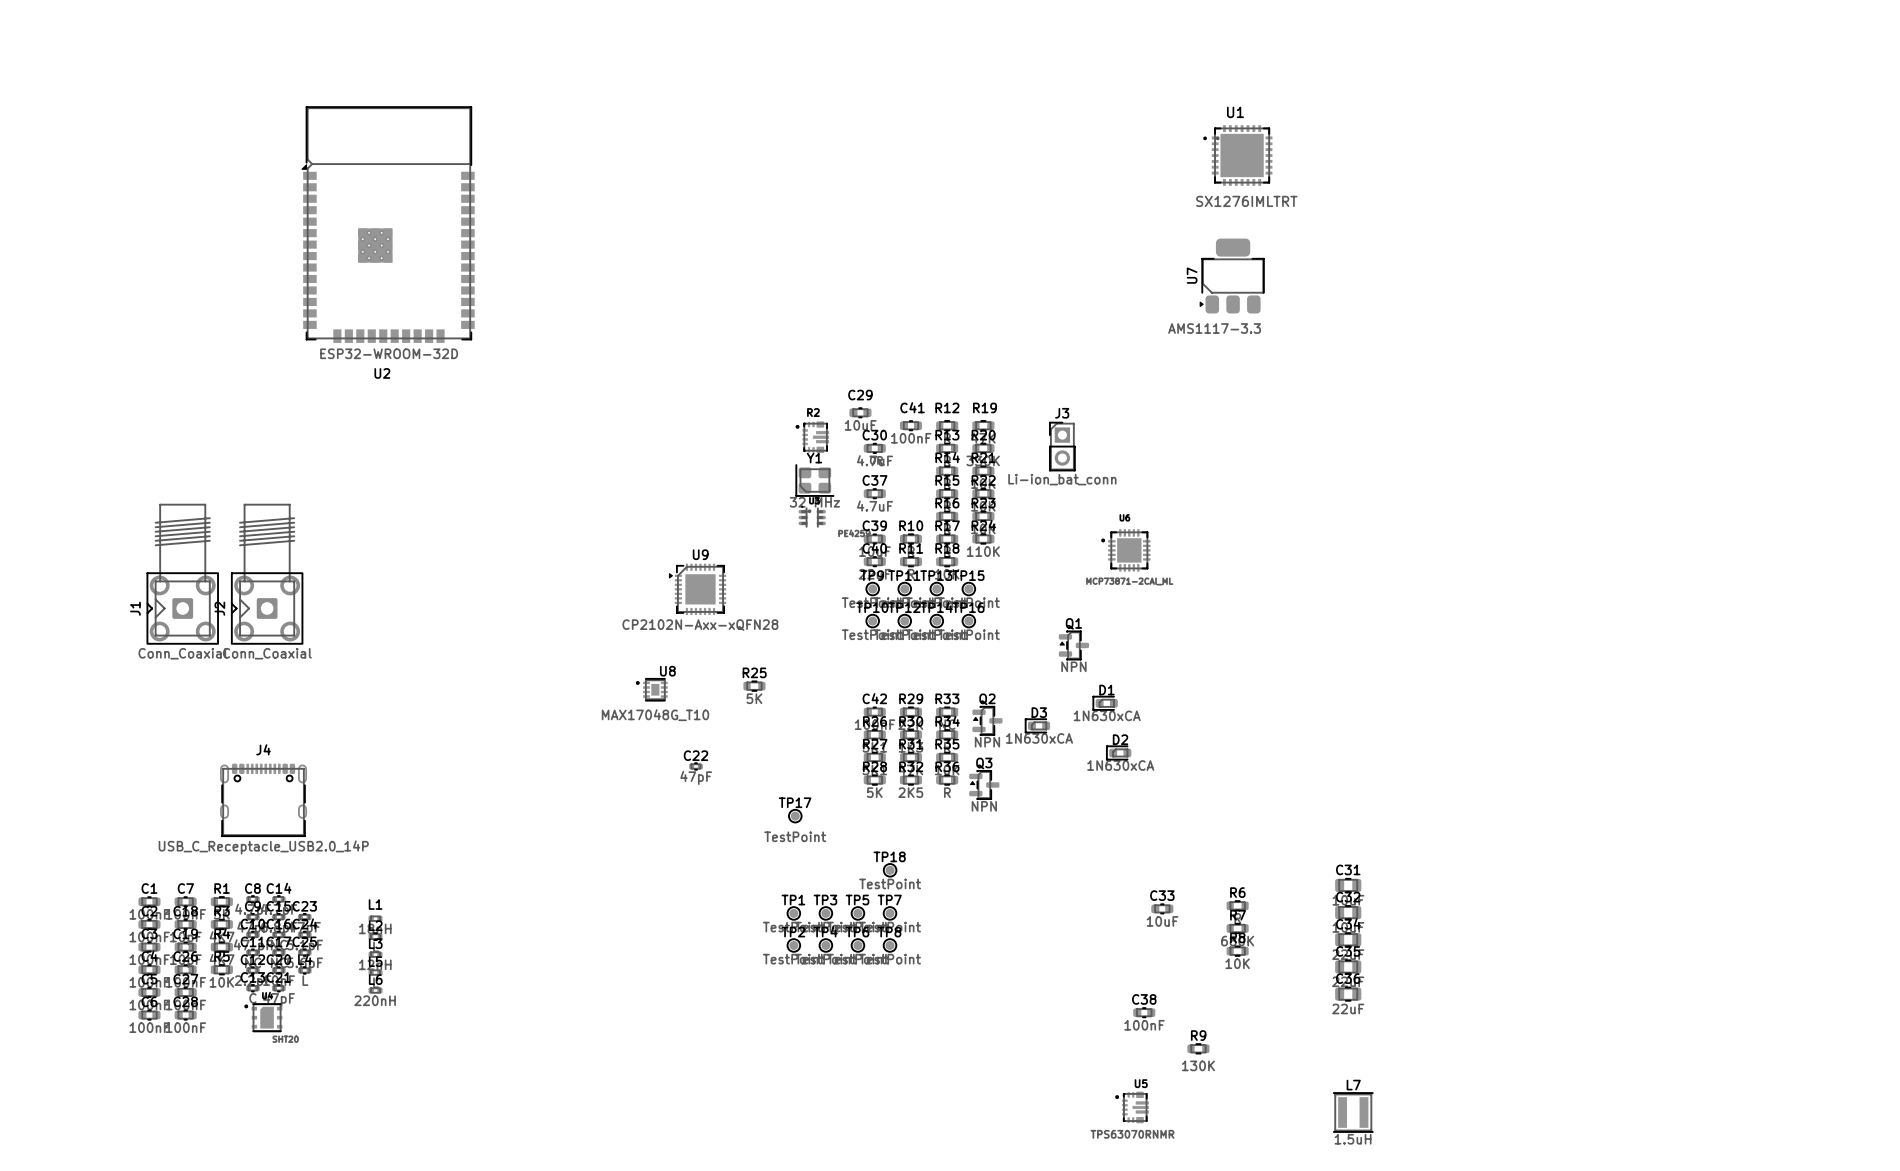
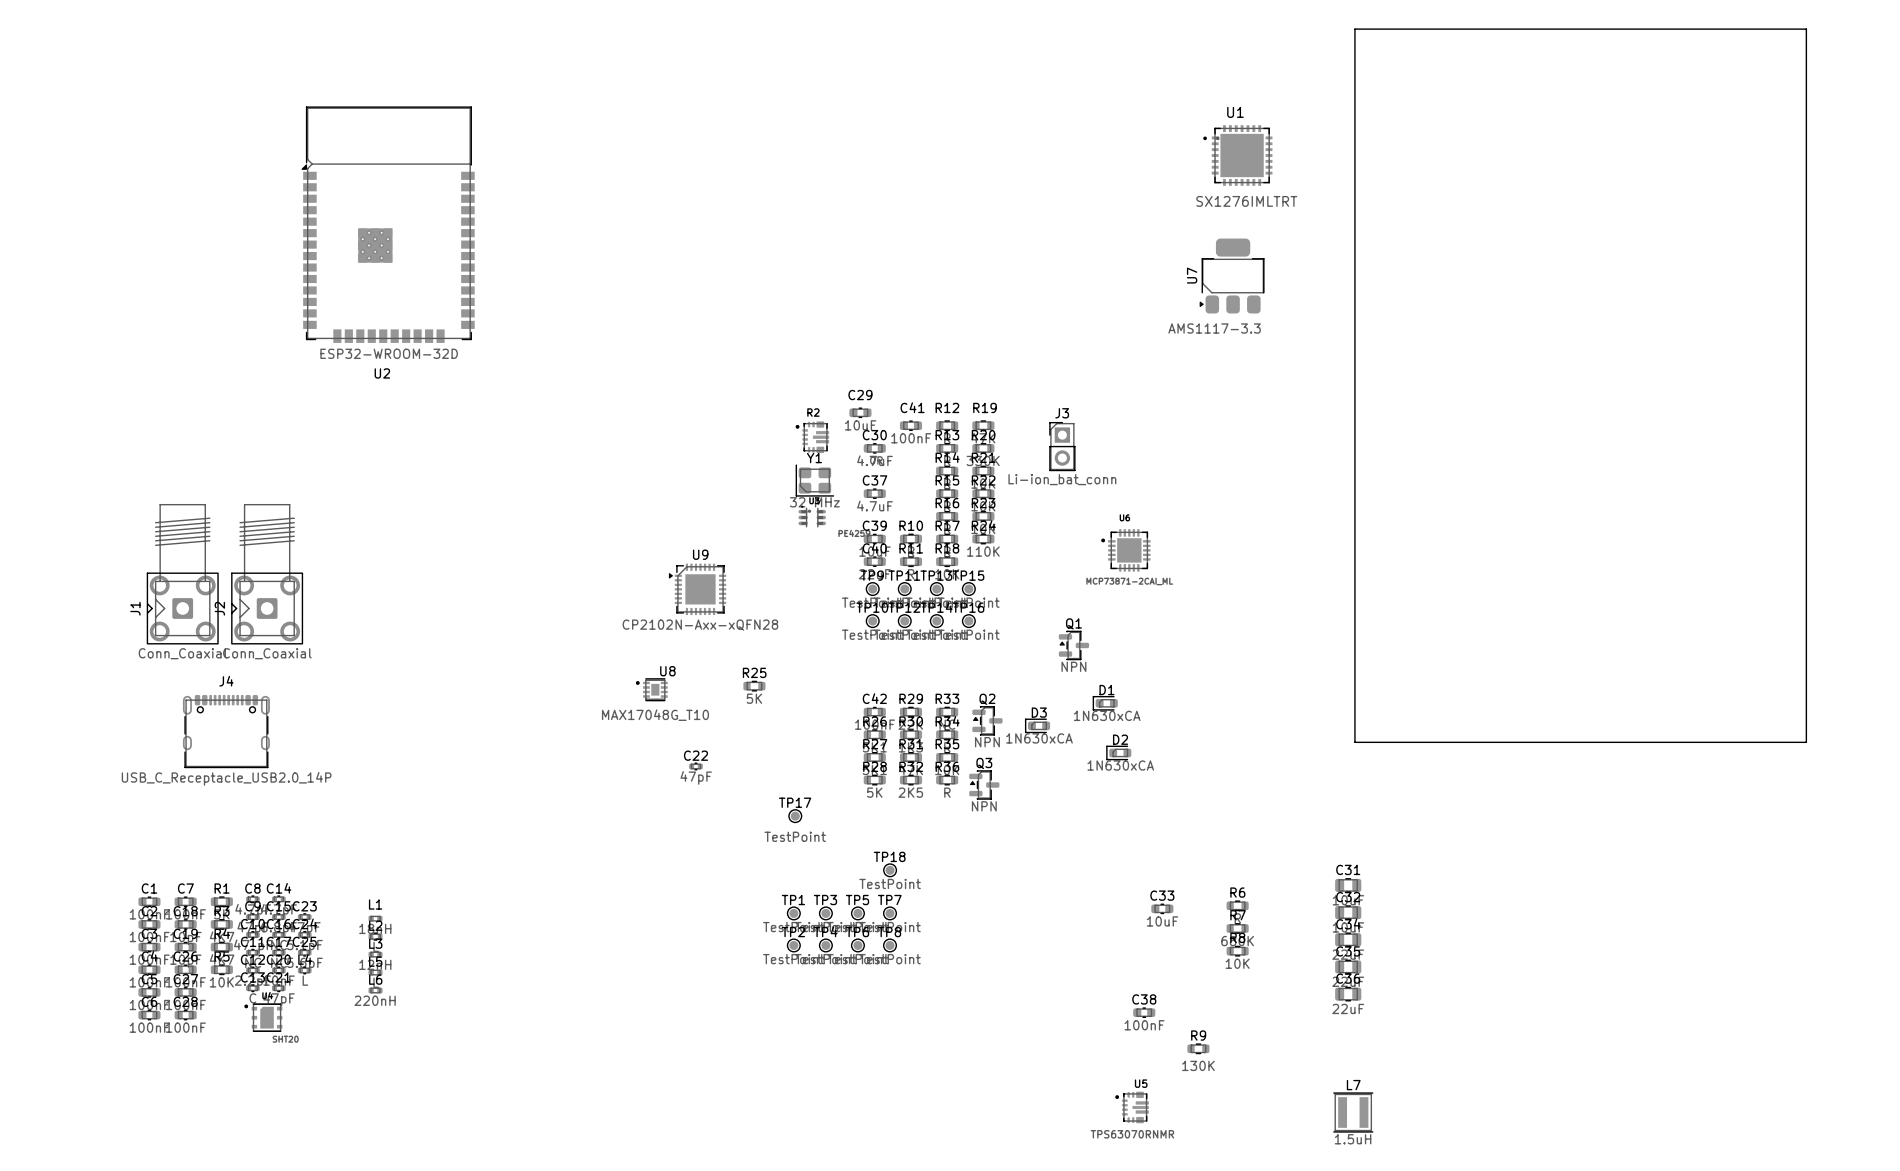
board edge: none -> (1354, 29) (1806, 29) (1806, 742) (1354, 742) (1354, 29)
J4 position: (263, 800) -> (226, 731)

